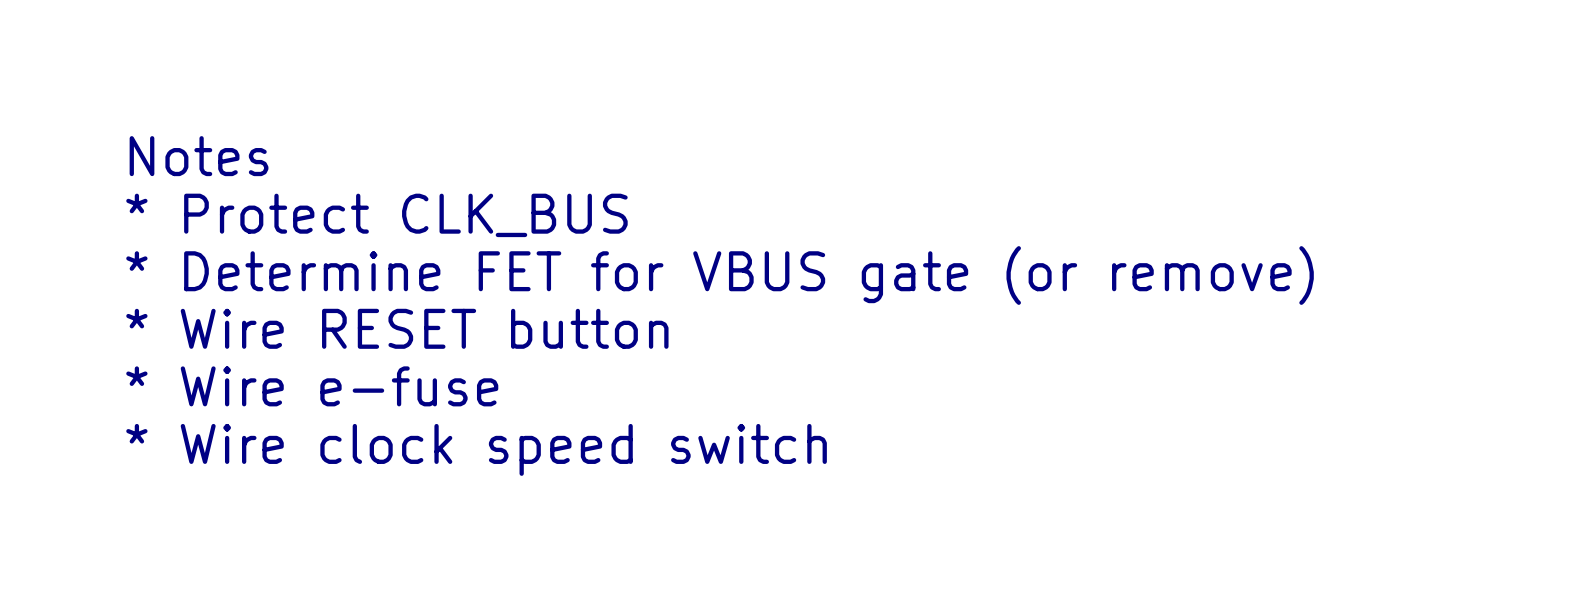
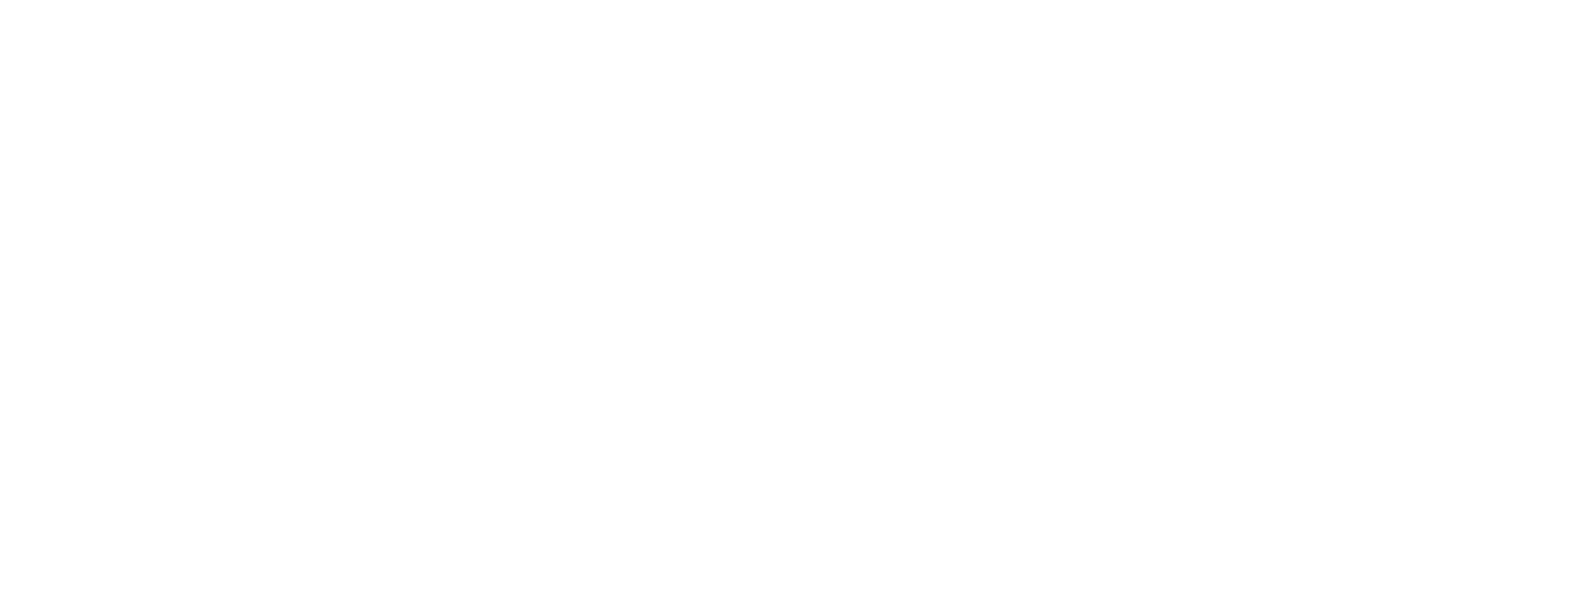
text: Notes (199, 156) -> none
text: * Protect CLK_BUS (376, 215) -> none
text: * Determine FET for VBUS gate (or remove) (720, 275) -> none
text: * Wire RESET button (397, 328) -> none
text: * Wire e-fuse (312, 386) -> none
text: * Wire clock speed switch (476, 449) -> none

